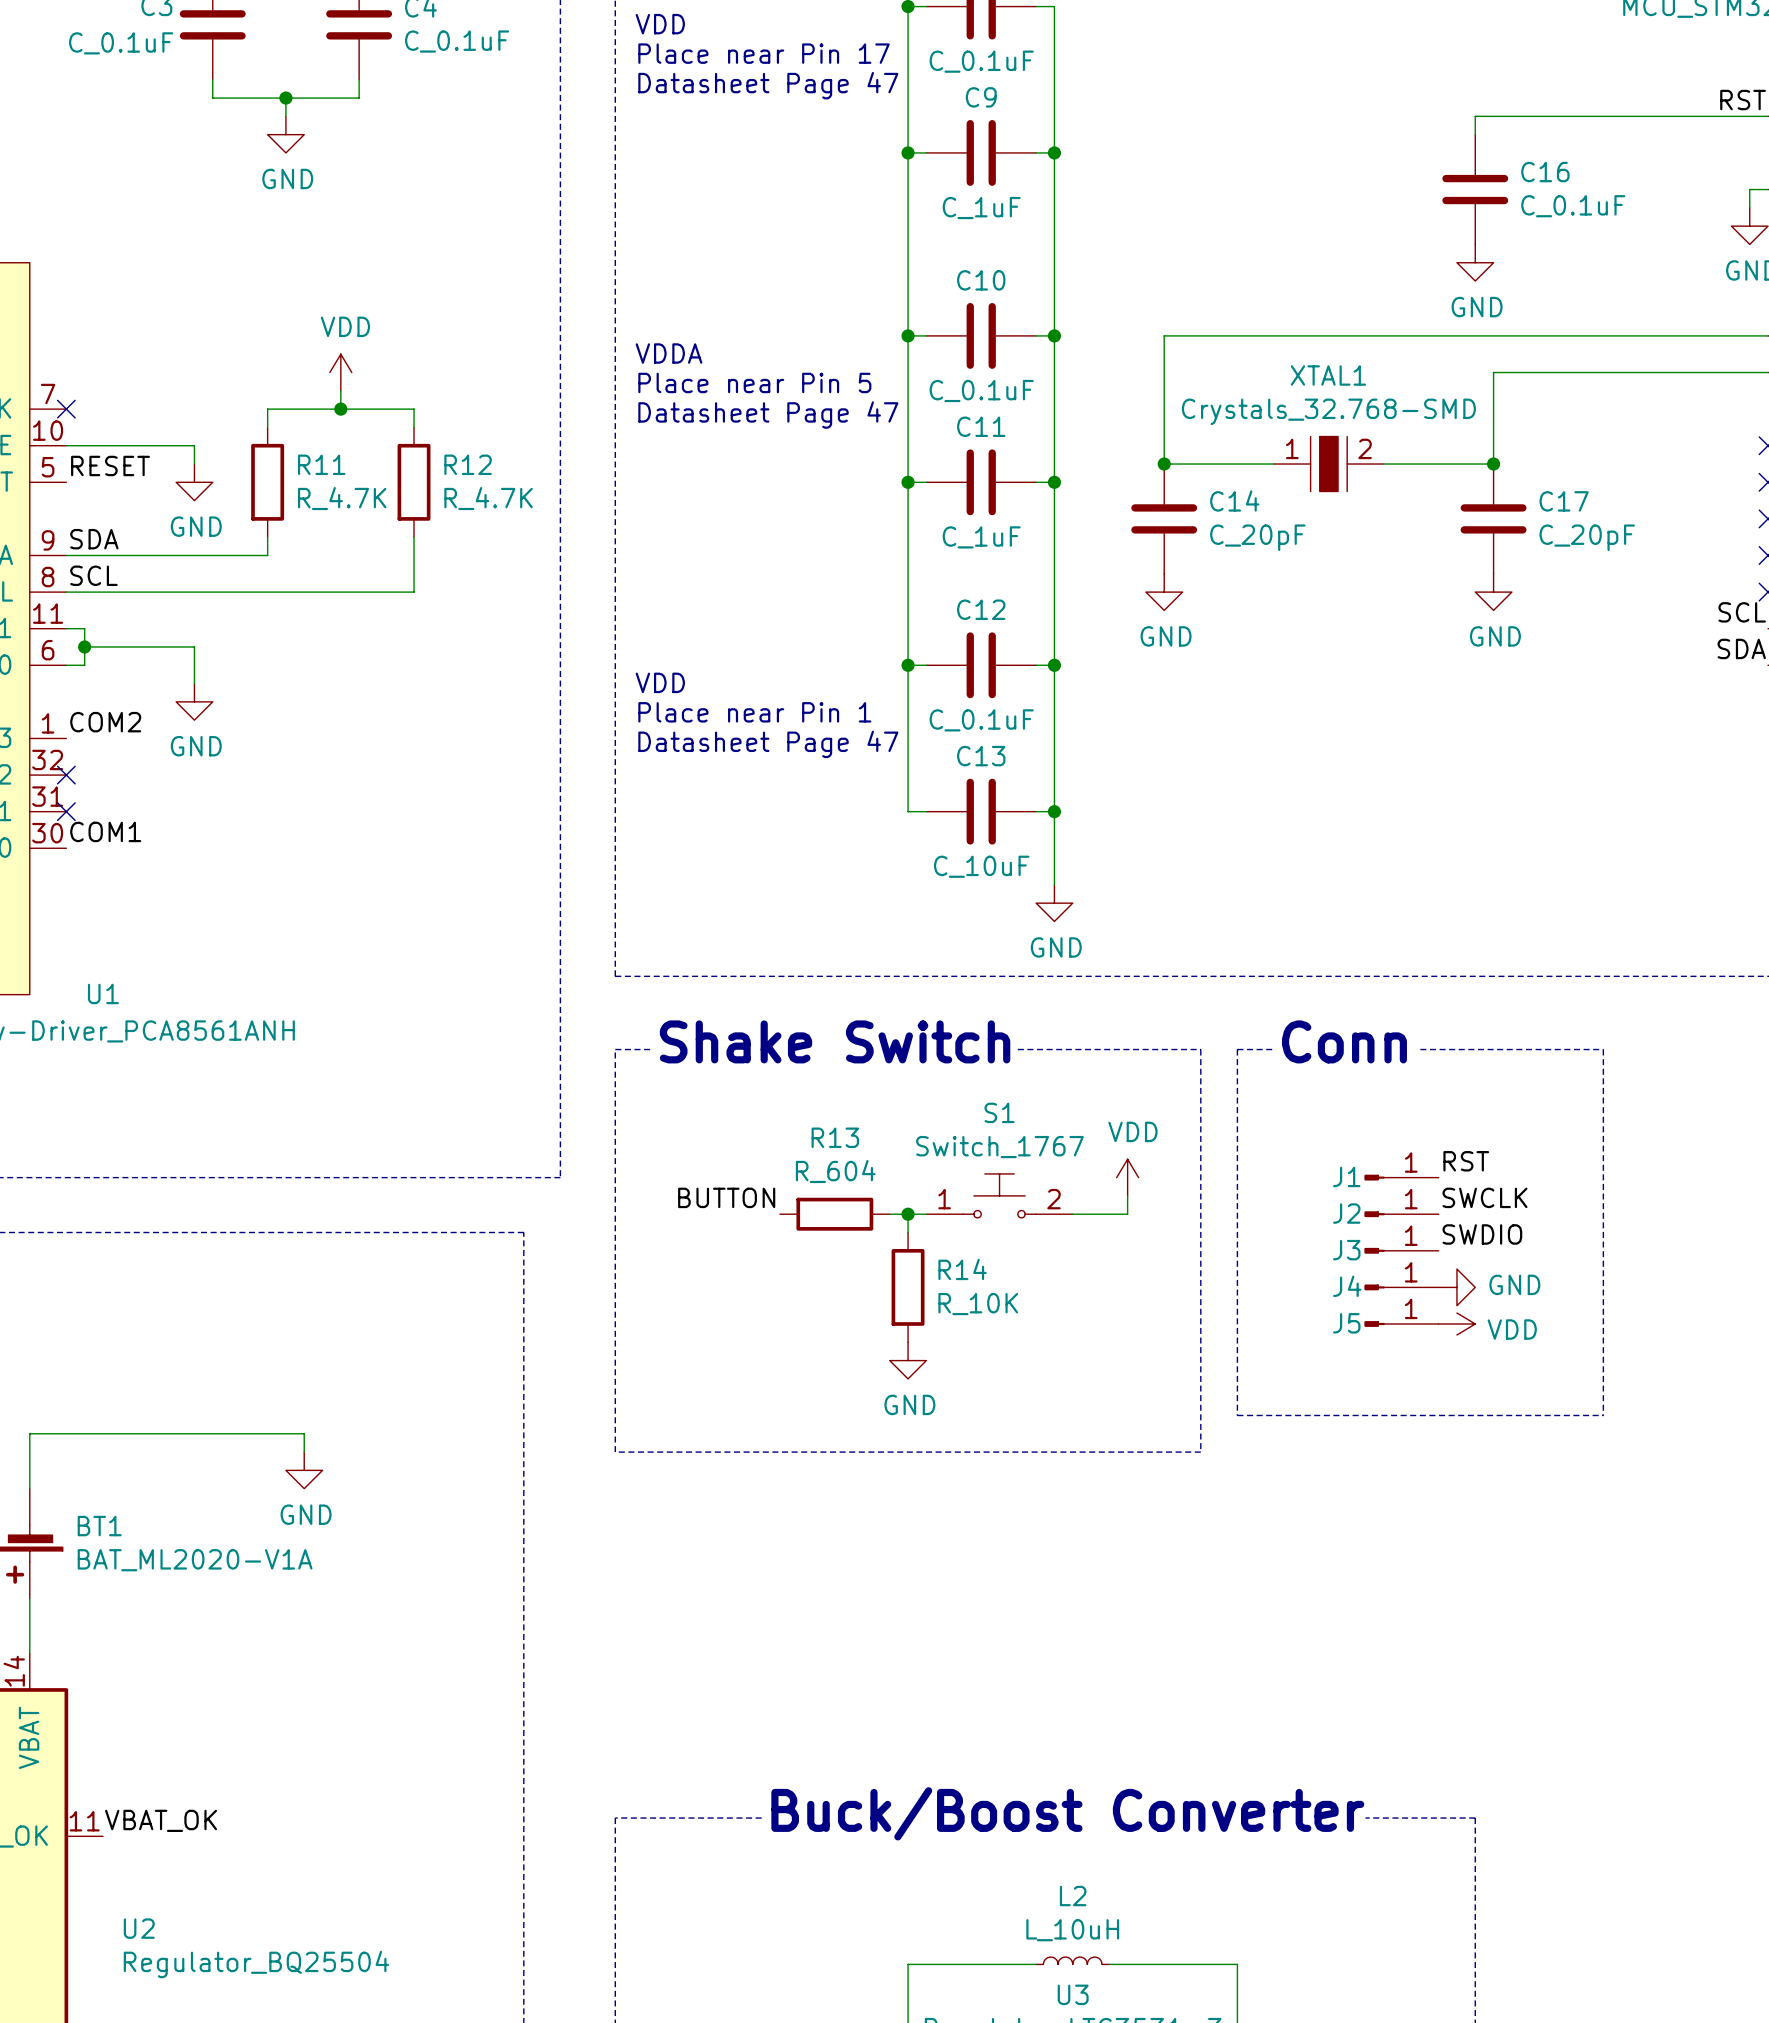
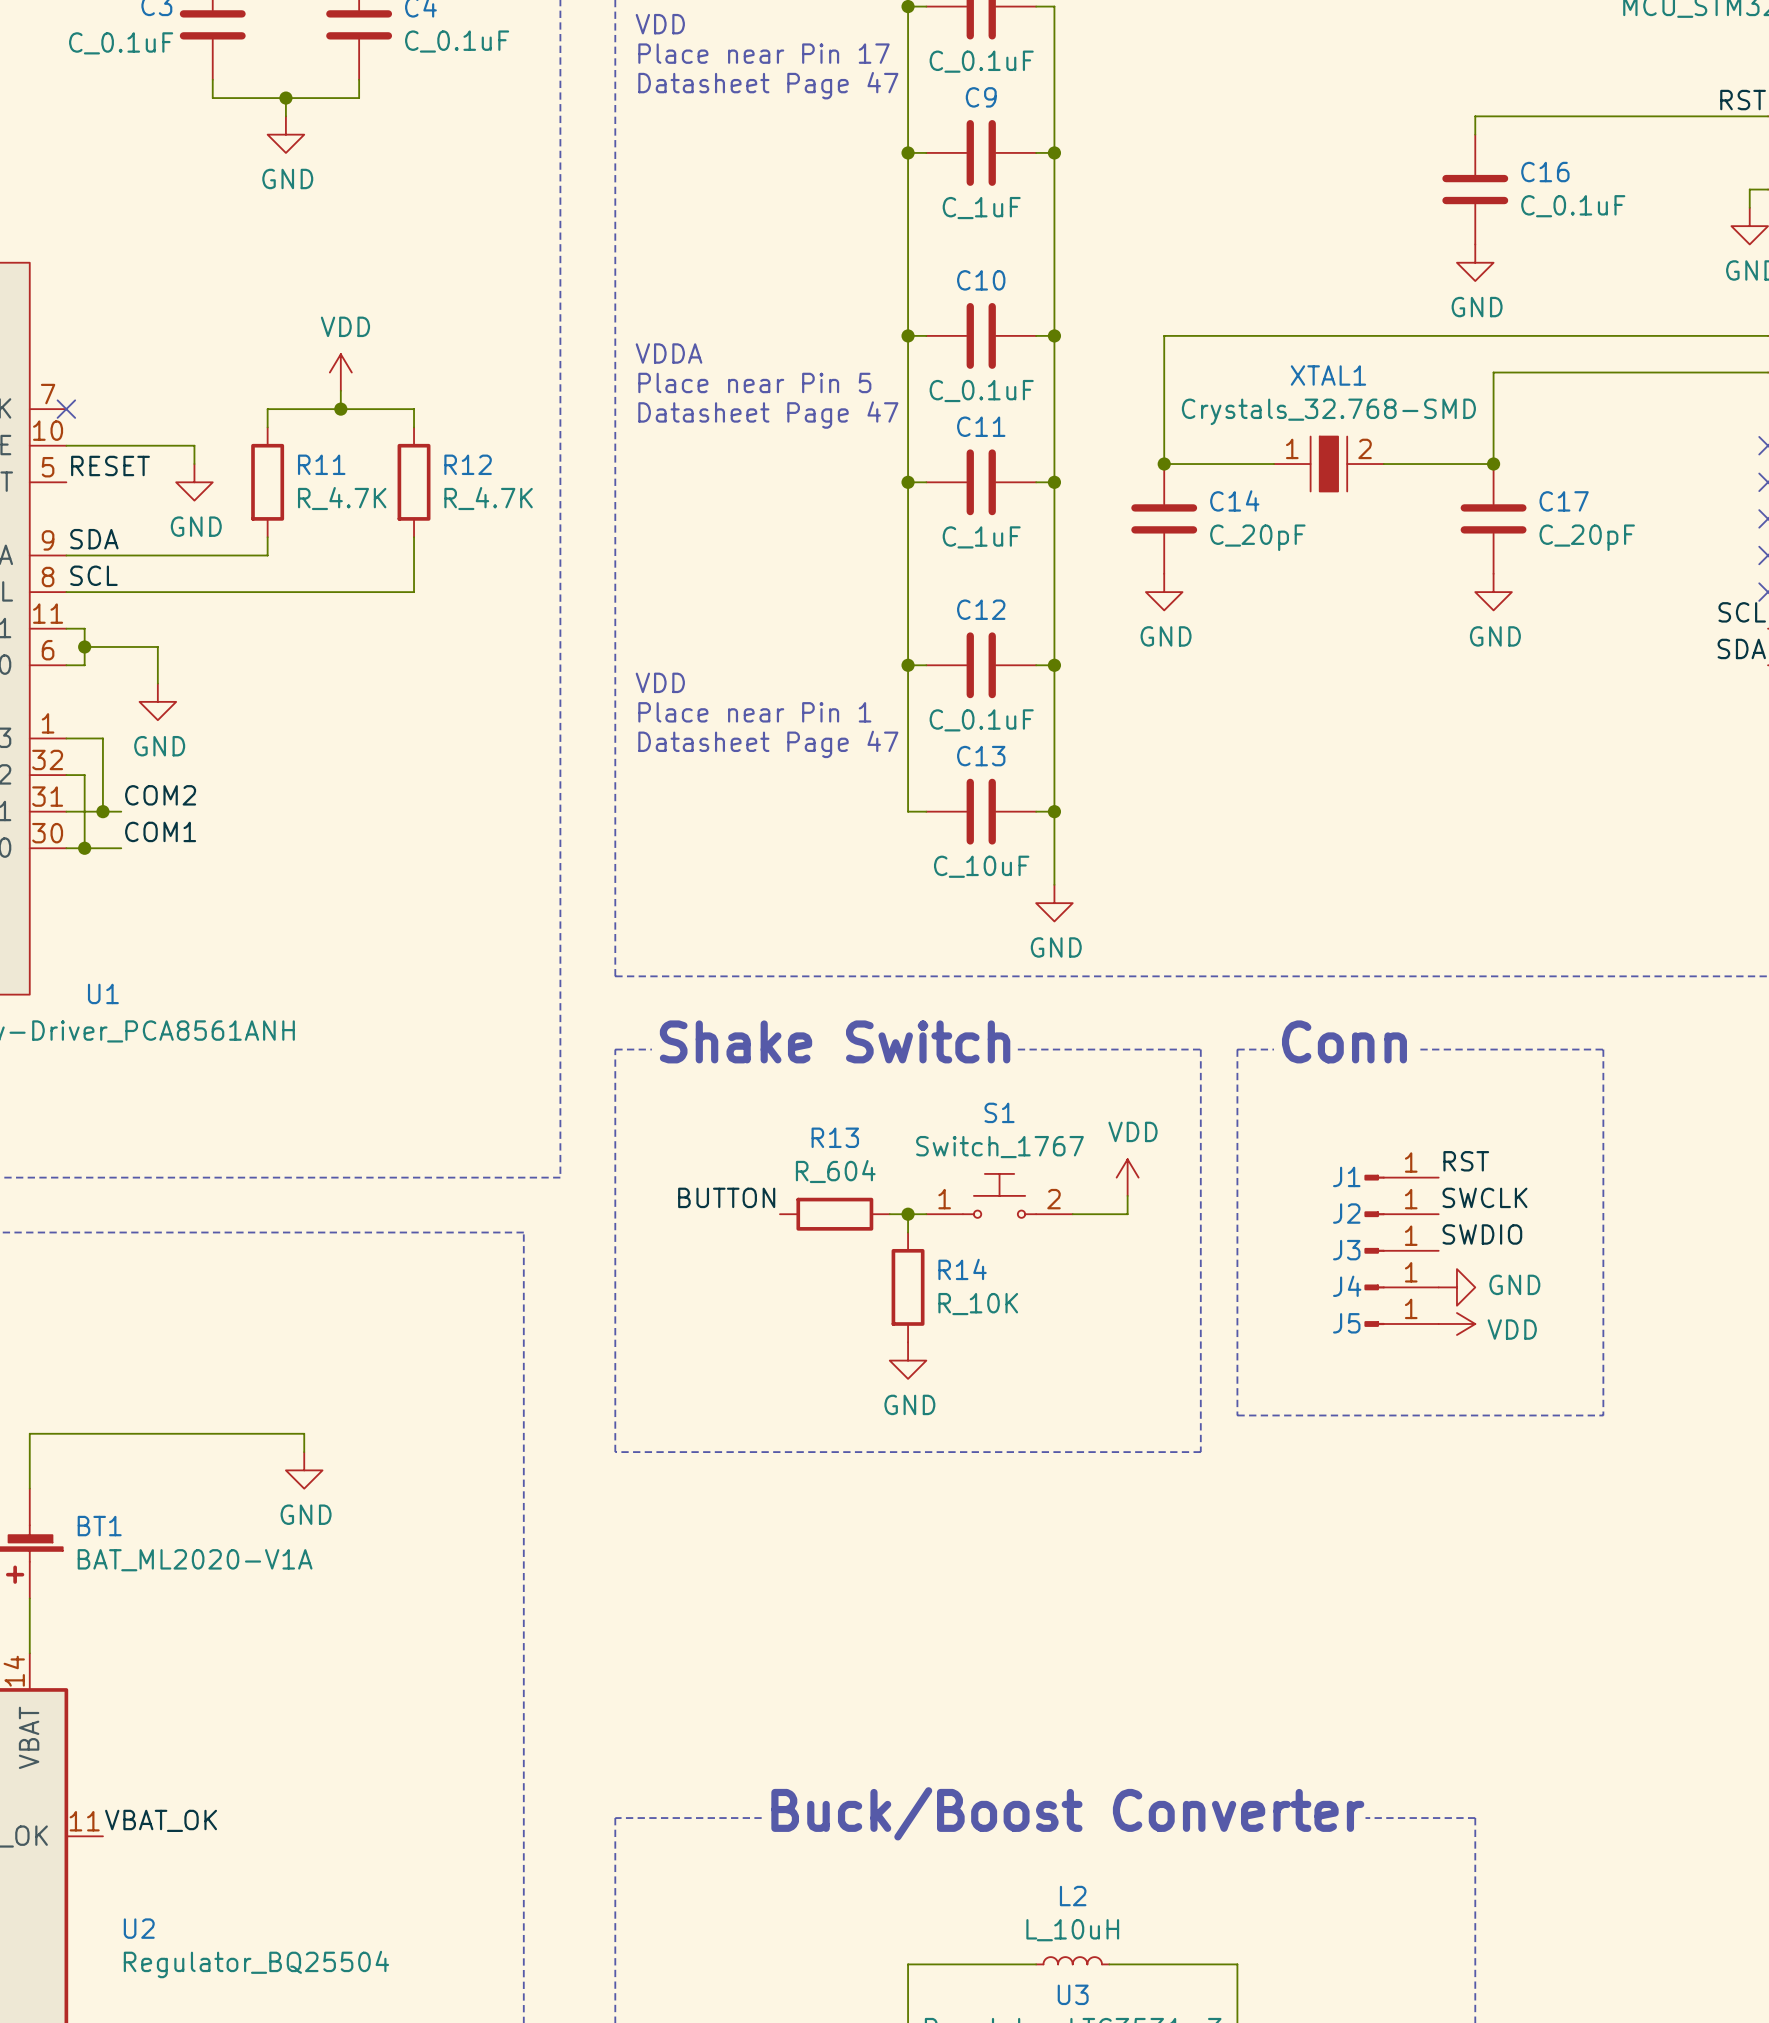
wire: (157, 646) (194, 646) (194, 683) -> (157, 646) (157, 683)
power symbol position: GND (194, 701) -> GND (157, 701)
label position: COM2 (105, 722) -> COM2 (160, 795)
wire: none -> (66, 738) (102, 738) (102, 811)
wire: none -> (66, 775) (84, 775) (84, 848)
no-connect mark: (66, 775) -> none
wire: none -> (66, 811) (121, 811)
no-connect mark: (66, 811) -> none
junction: none -> (102, 811)
label position: COM1 (105, 831) -> COM1 (160, 831)
wire: none -> (66, 848) (121, 848)
junction: none -> (84, 848)

